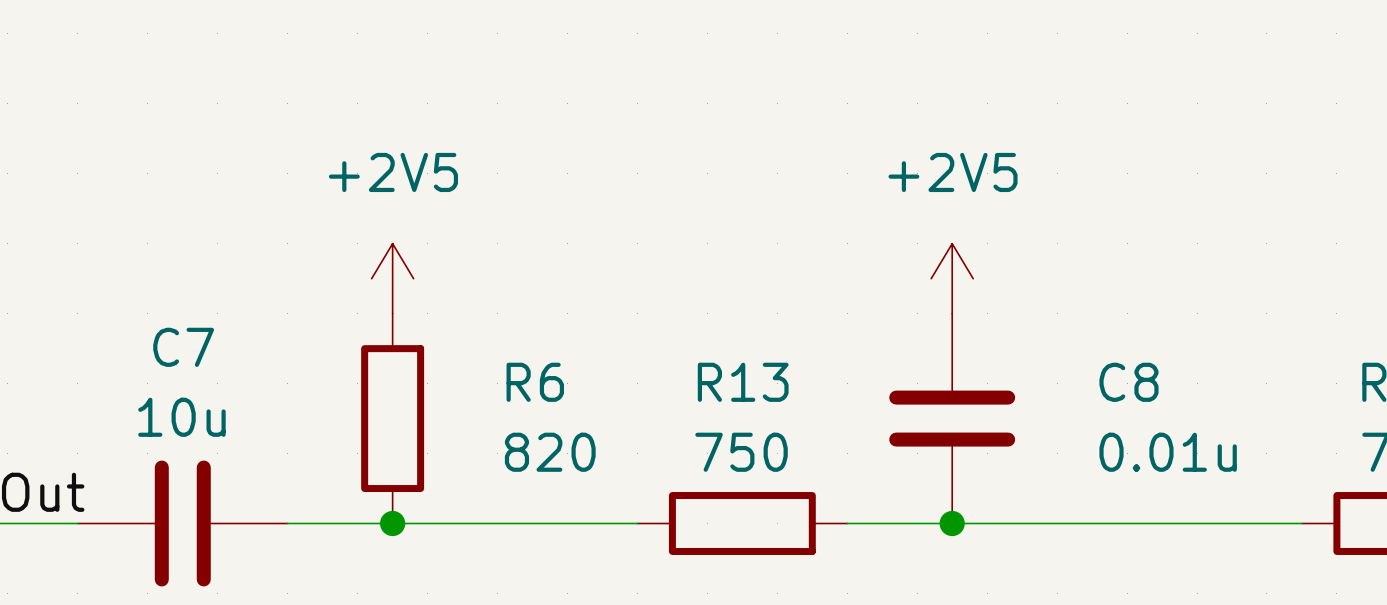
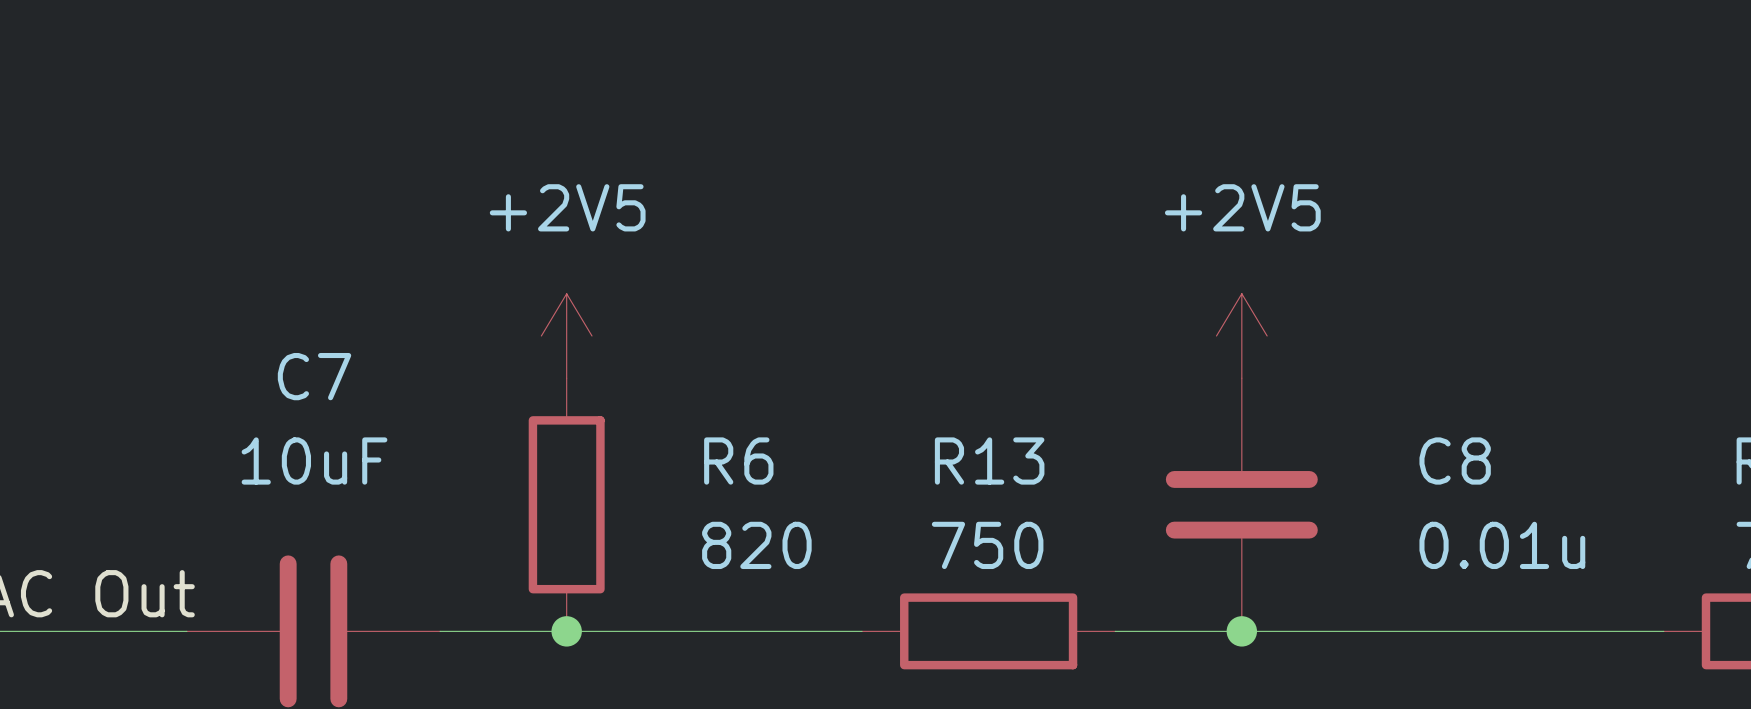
C7 name position: C7 (183, 347) -> C7 (314, 376)
C7 value: 10u (181, 417) -> 10uF (314, 461)

